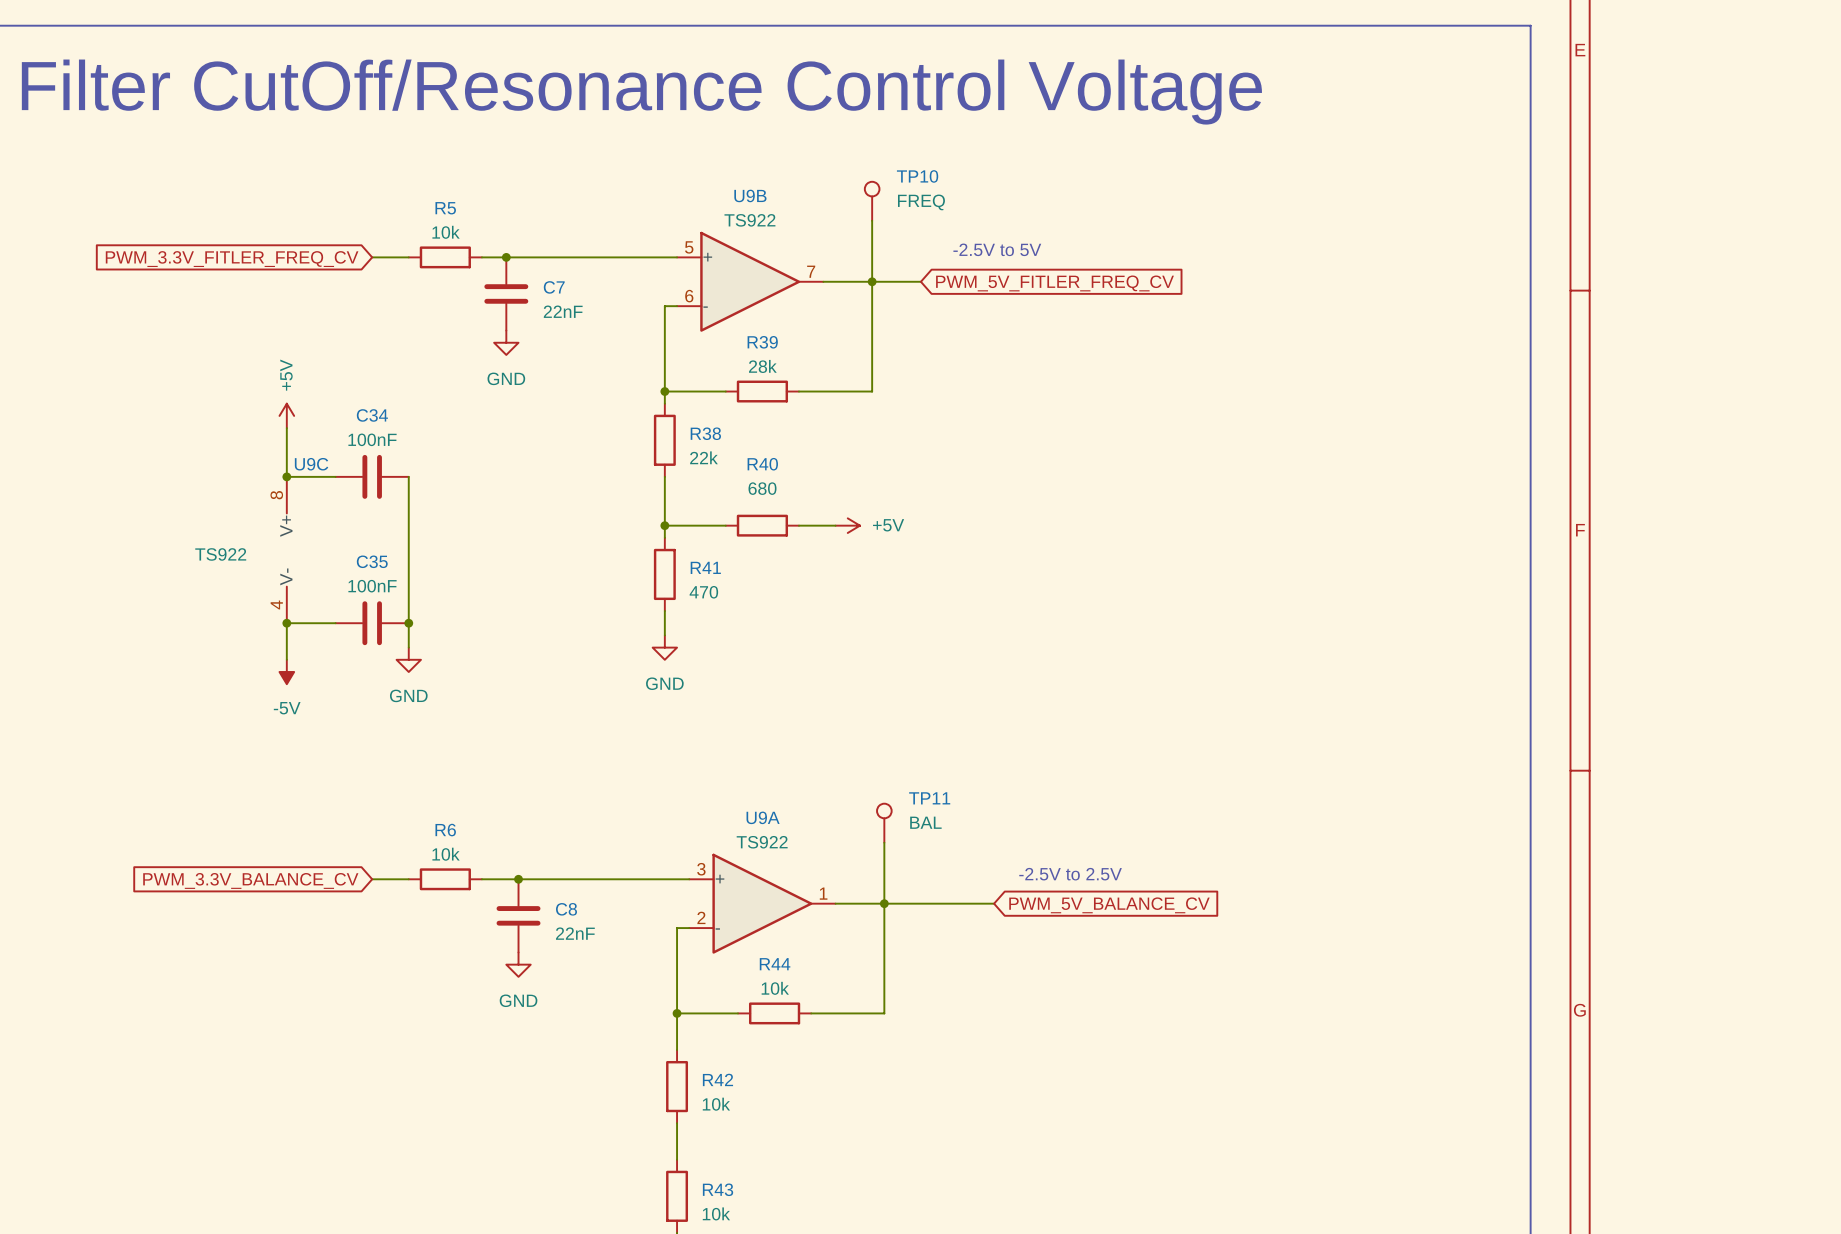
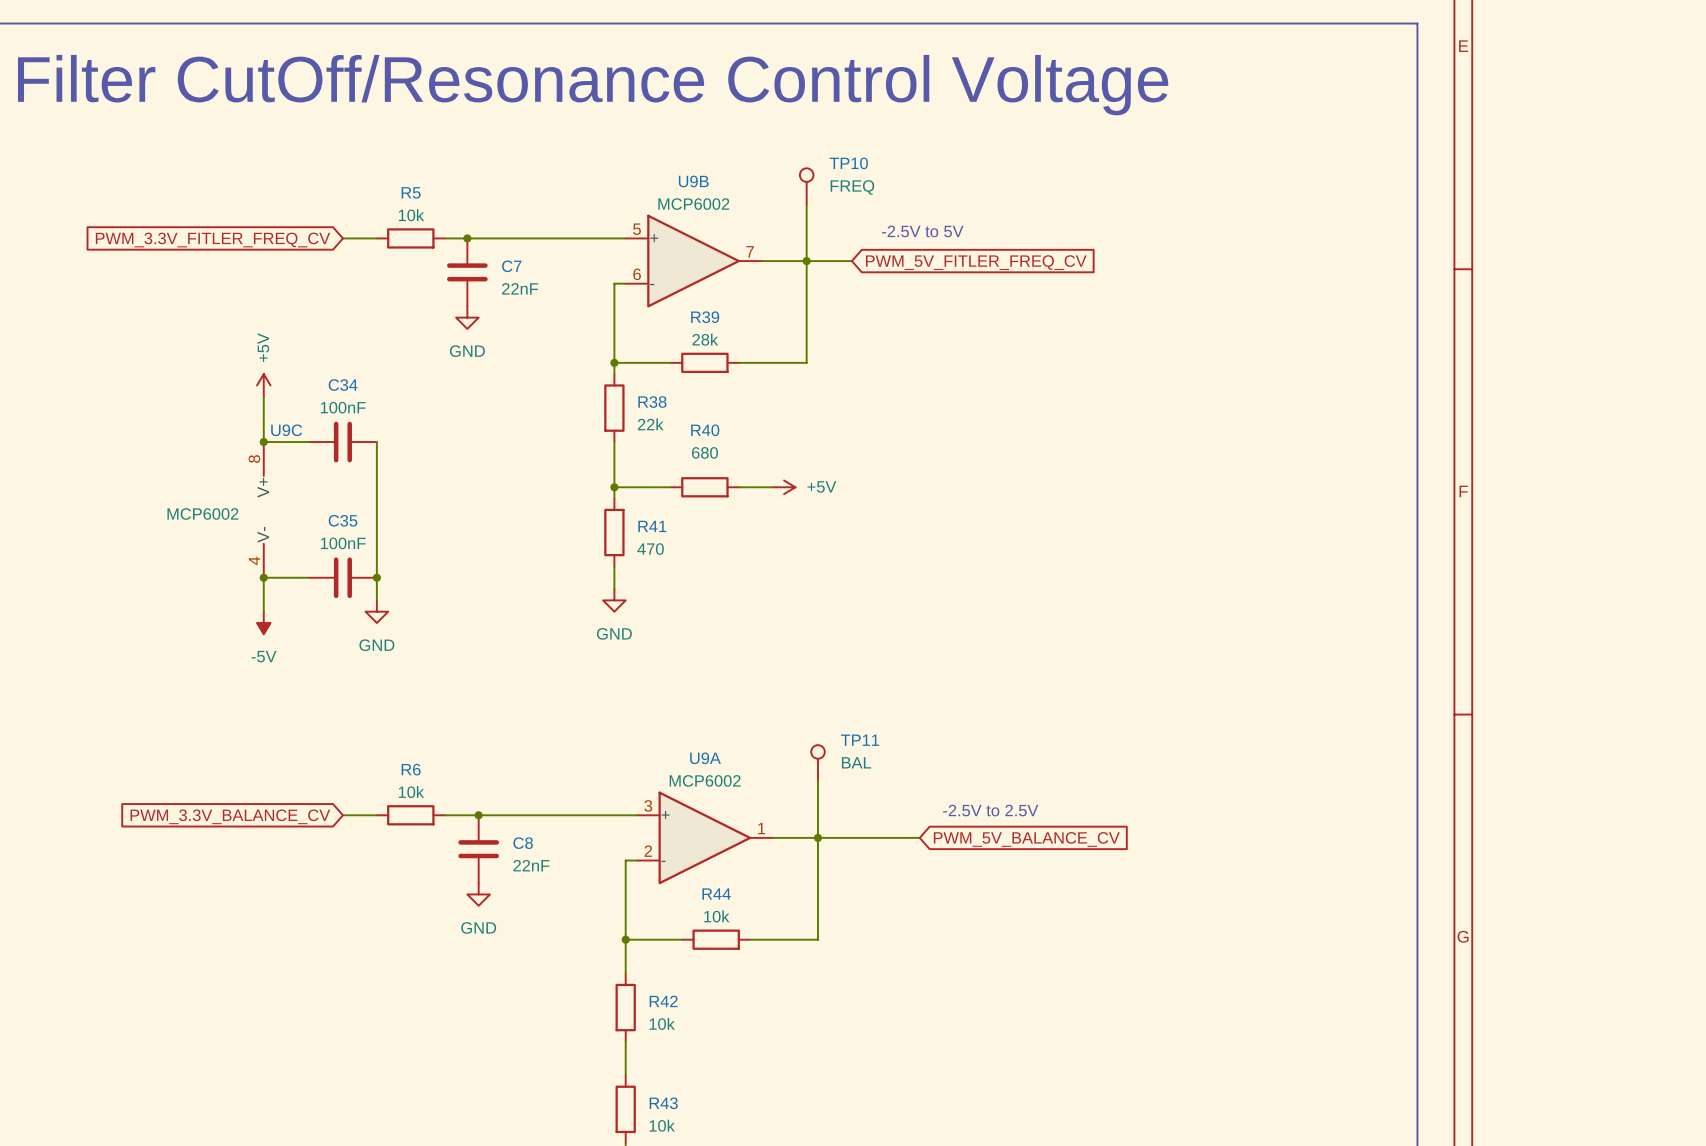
U9B value: TS922 (749, 220) -> MCP6002 (693, 204)
U9C value: TS922 (220, 554) -> MCP6002 (202, 513)
U9A value: TS922 (762, 842) -> MCP6002 (705, 780)

